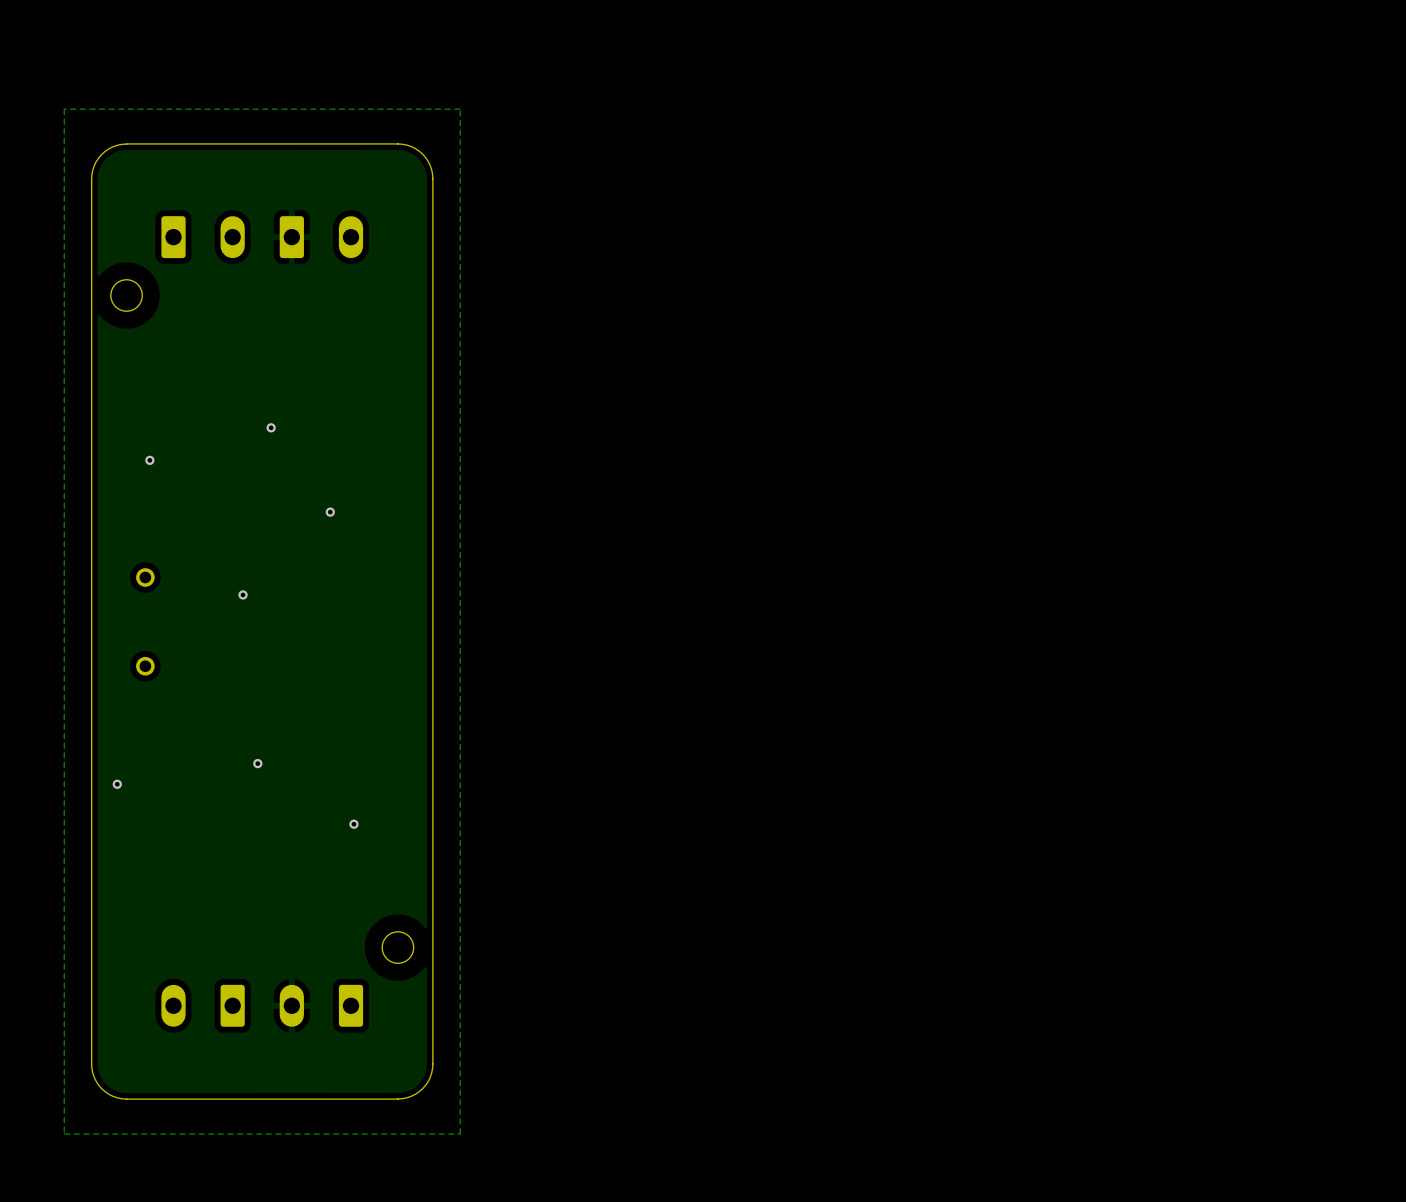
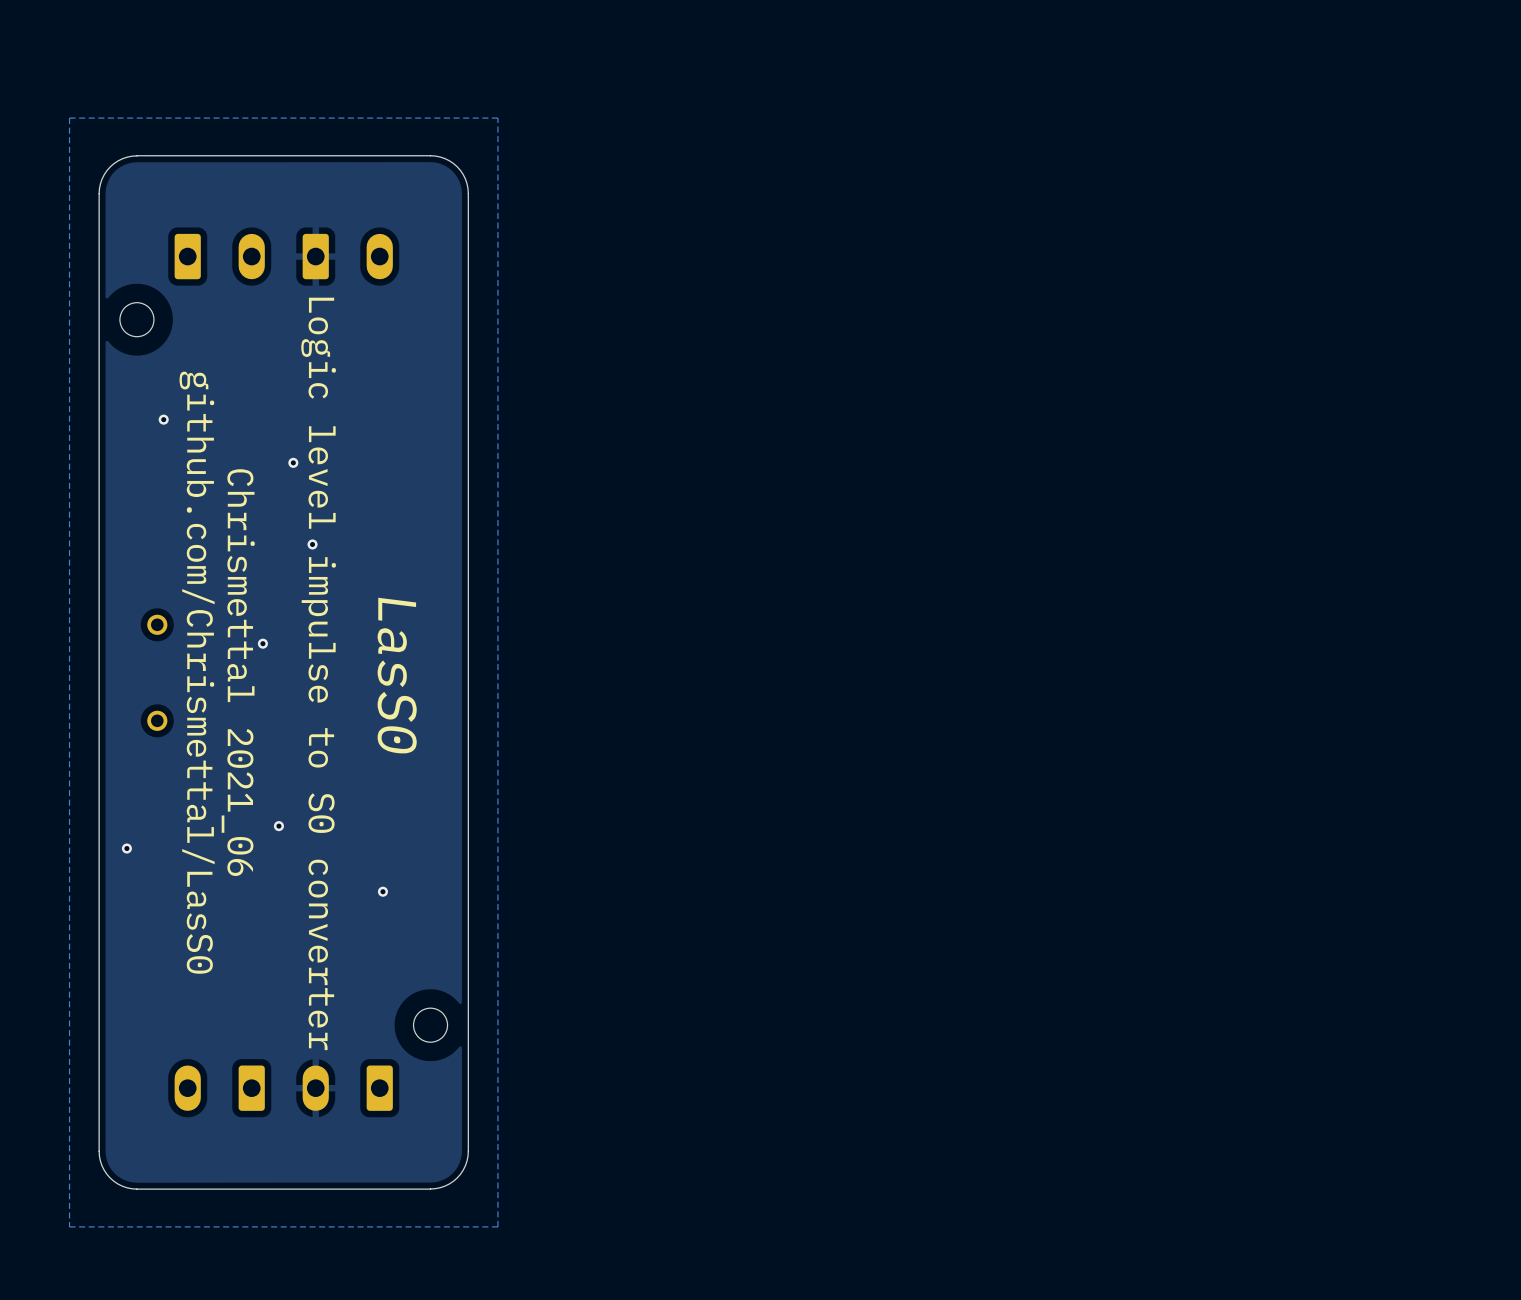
via: none -> (163, 419)
via: (149, 460) -> none
via position: (330, 512) -> (312, 544)
text: none -> github.com/Chrismettal/LasS0 (197, 672)
text: none -> Chrismettal 2021_06 (238, 672)
text: none -> Logic level impulse to S0 converter (318, 673)
text: none -> LasS0 (397, 675)

